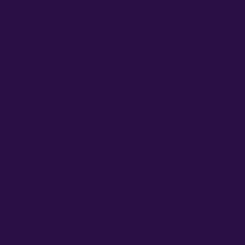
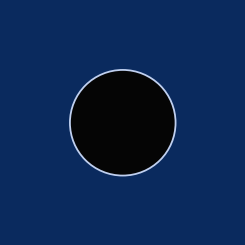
hole: none -> (122, 122)

